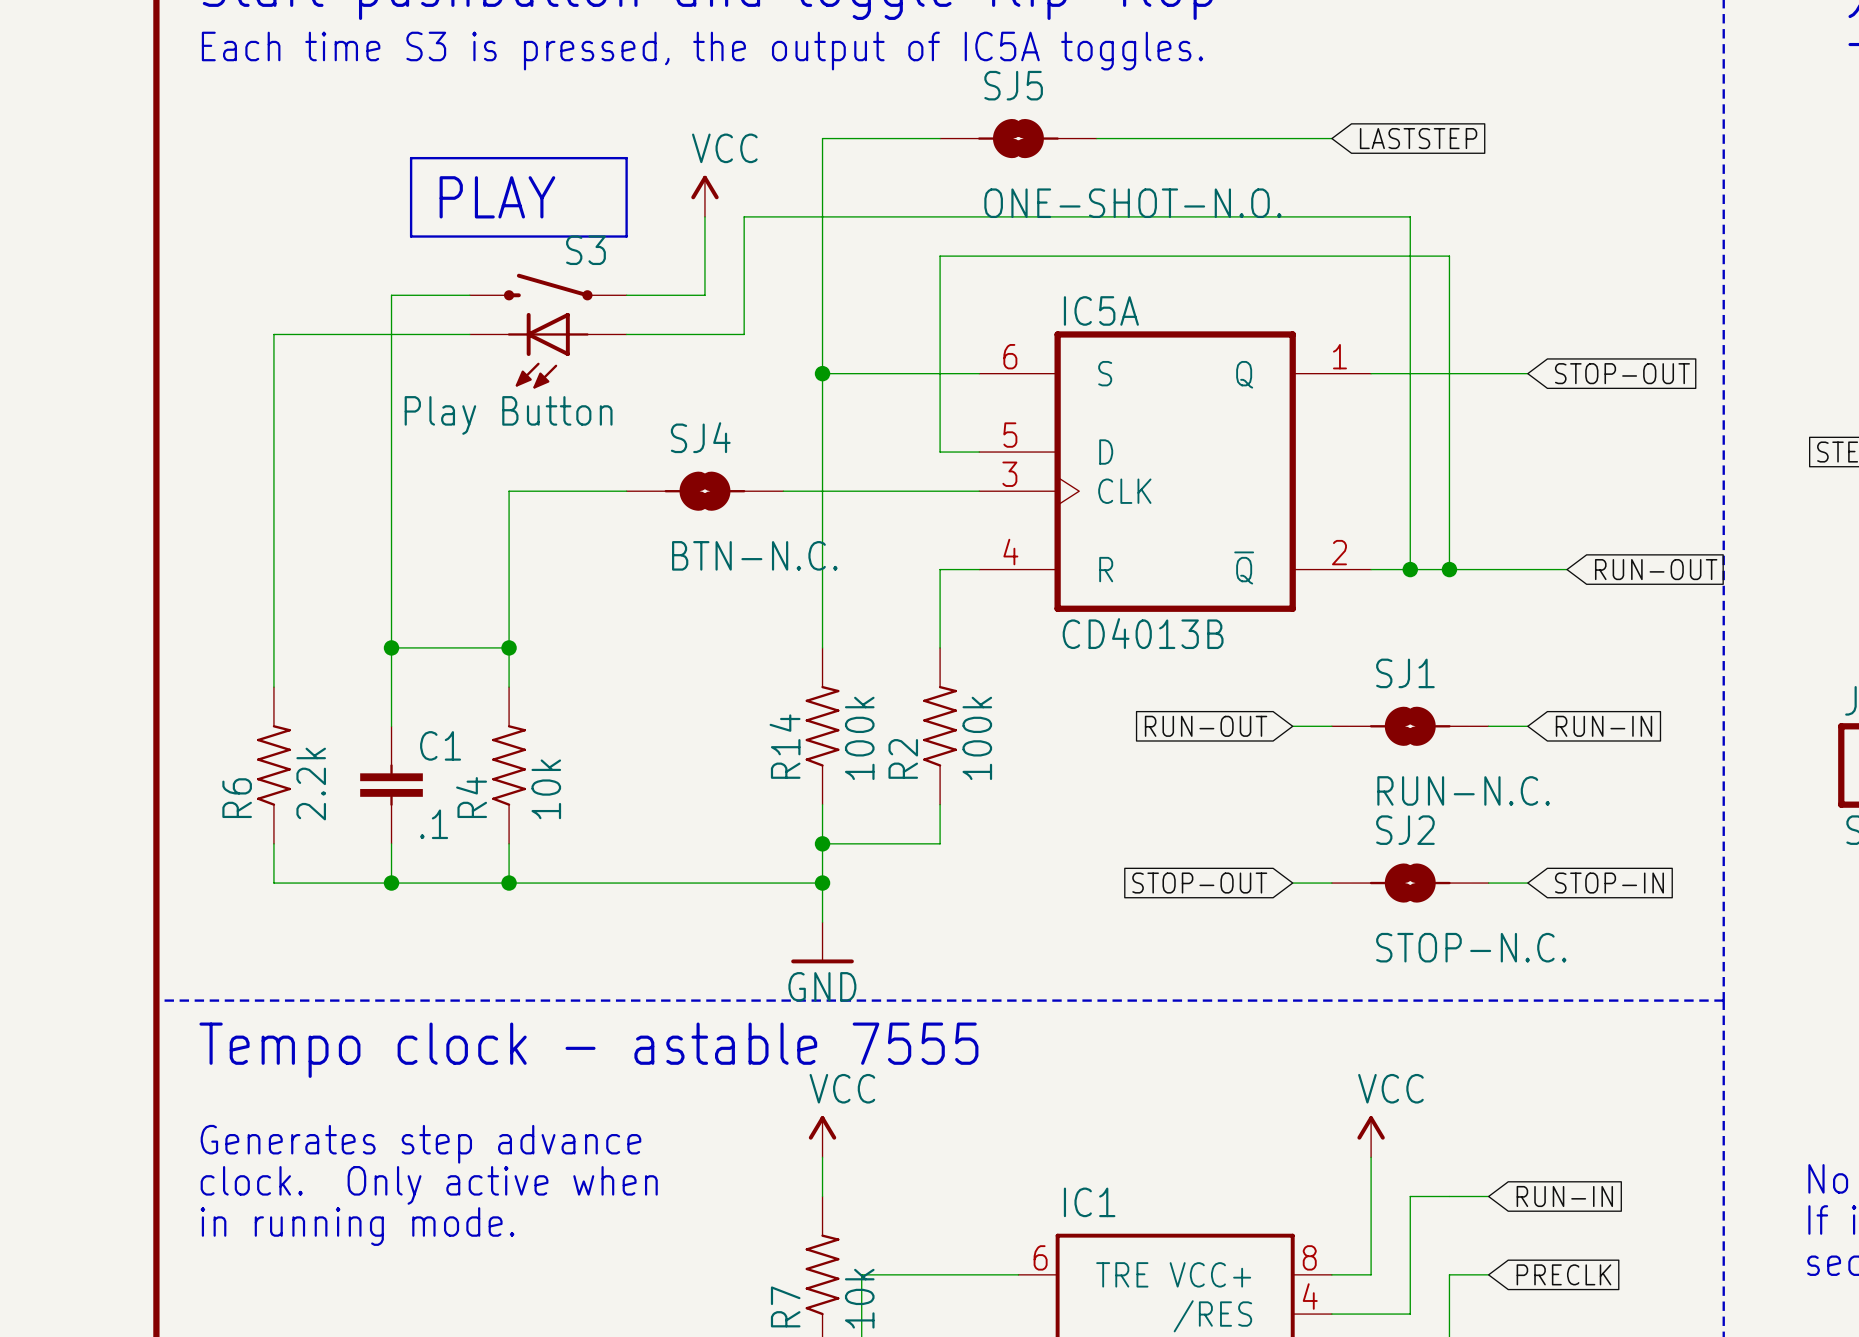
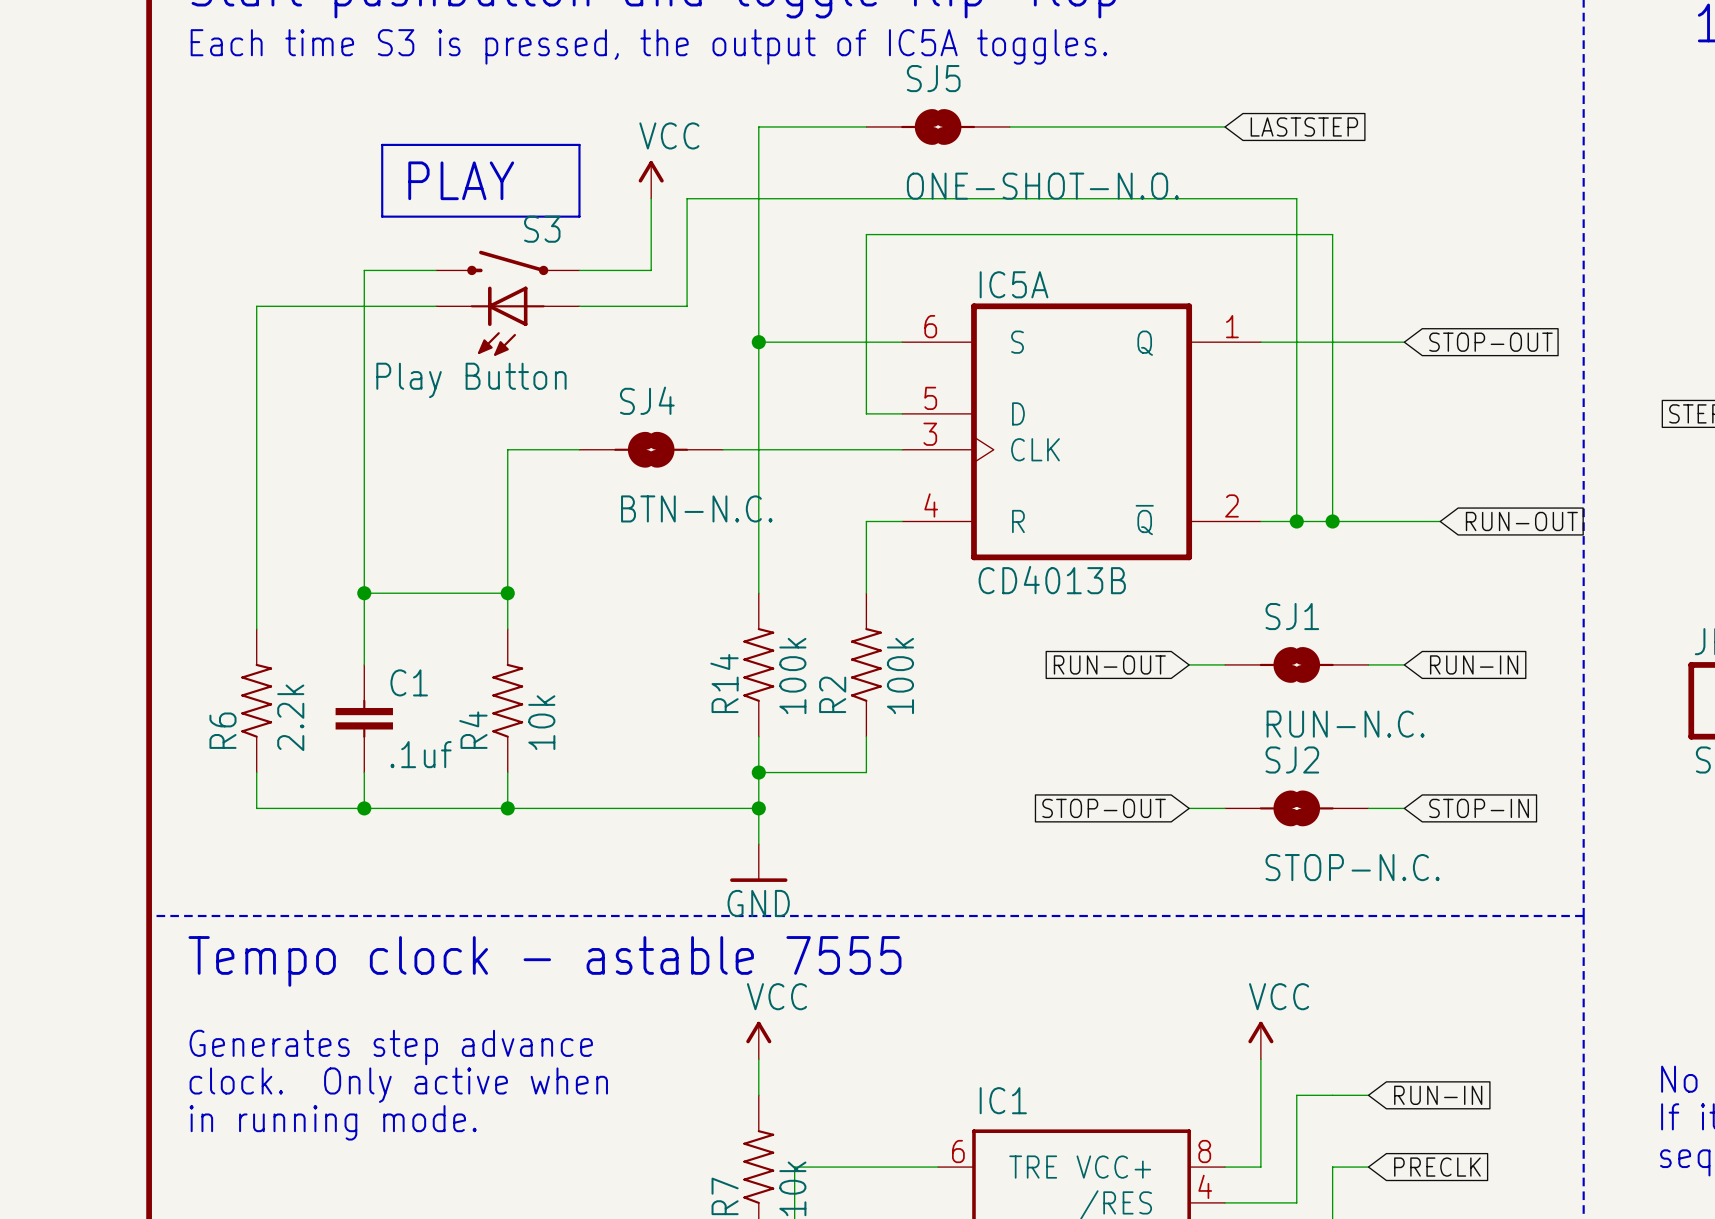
wire: (548, 491) (509, 491) (509, 687) -> (507, 449) (507, 629)
wire: none -> (471, 593) (507, 593)
junction position: (509, 647) -> (507, 593)
R4 position: (509, 765) -> (507, 700)
C1 value: .1 (434, 824) -> .1uf (421, 754)
wire: (509, 843) (509, 883) -> (507, 772) (507, 808)
junction position: (509, 883) -> (507, 808)

